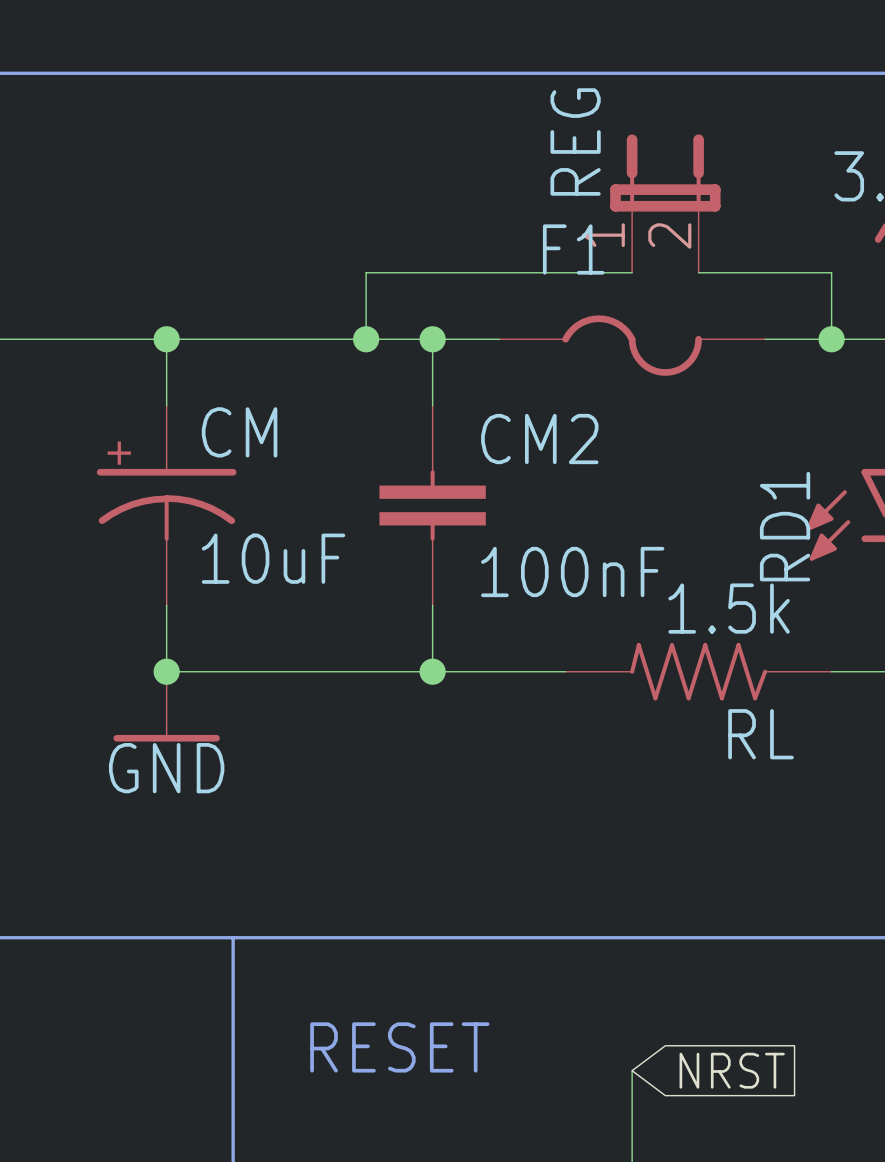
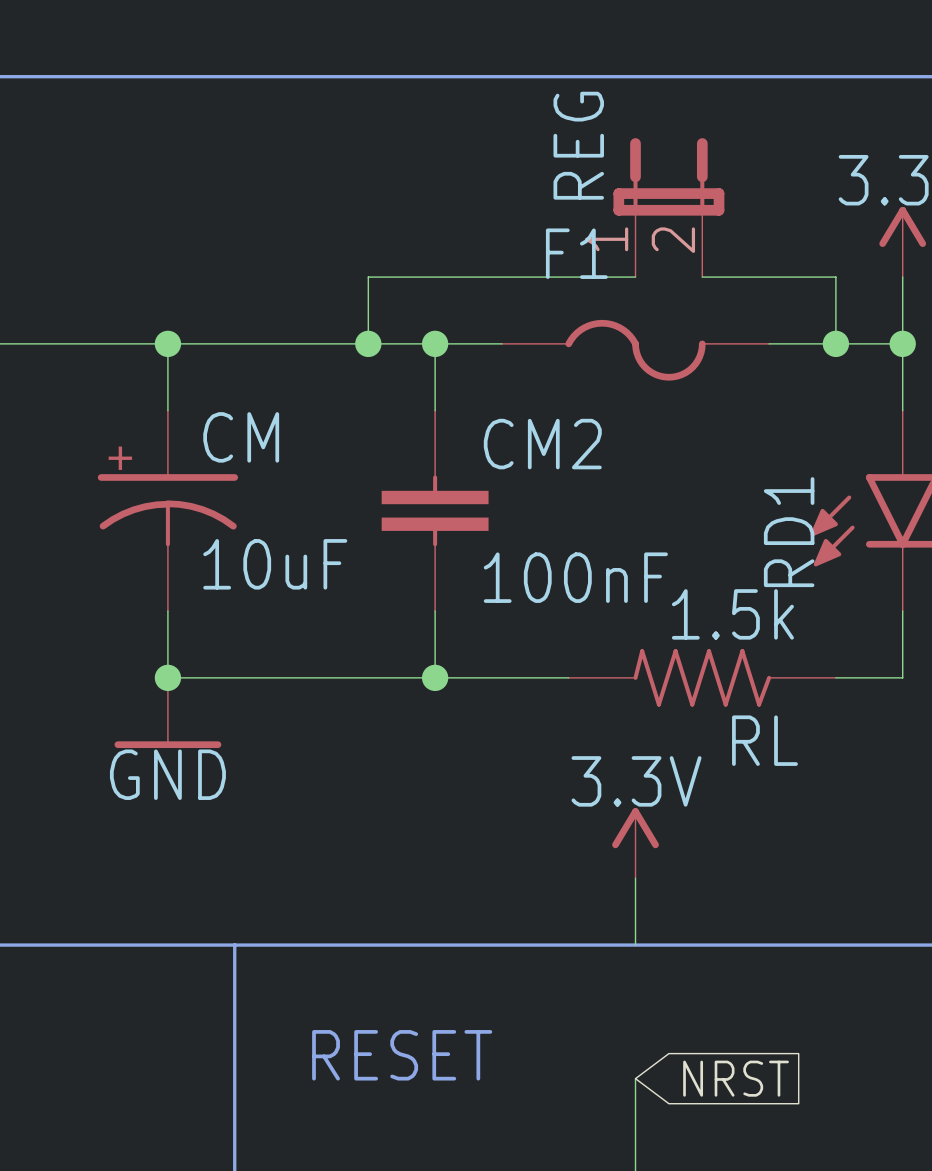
power symbol: none -> 3.3V (635, 843)
wire: none -> (635, 878) (635, 945)

